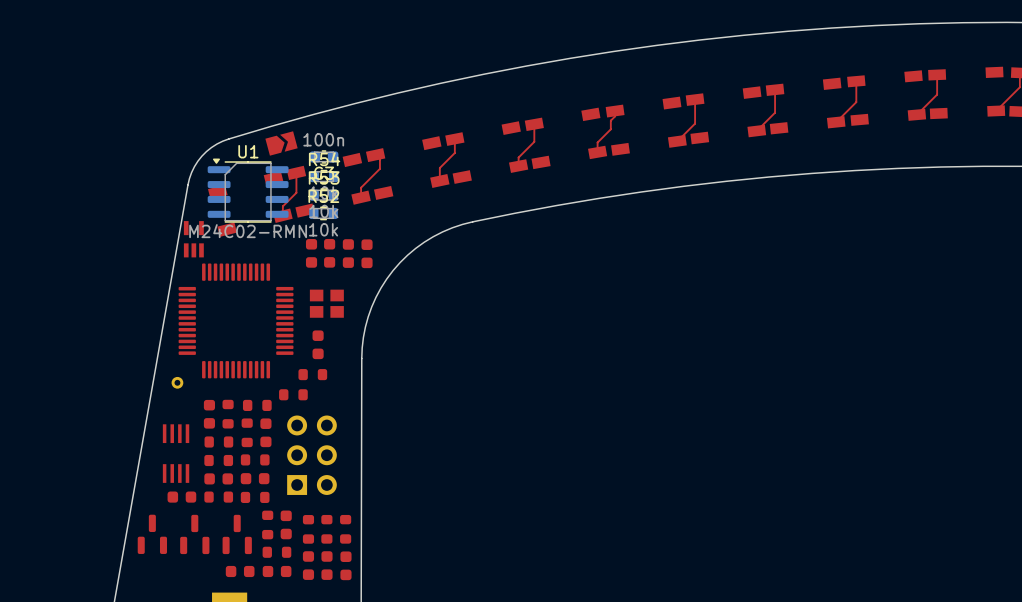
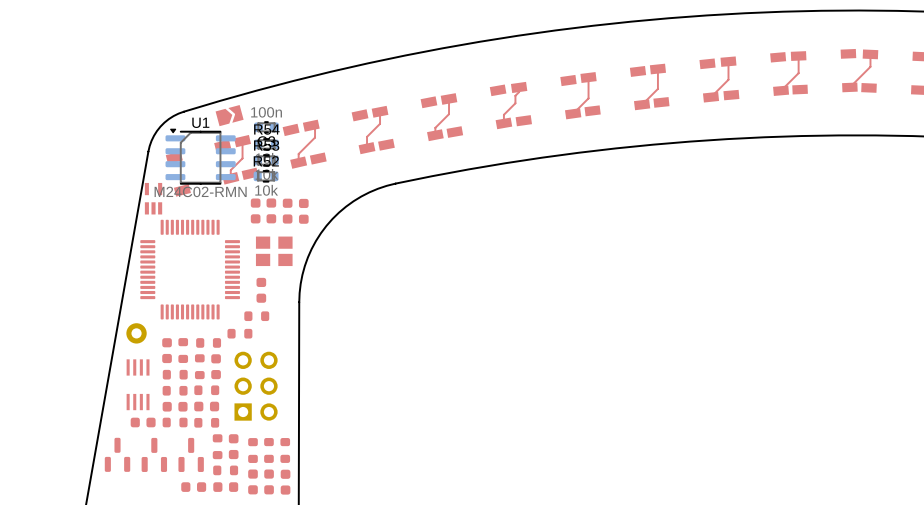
part footprint: [309, 289, 344, 318] -> [255, 236, 293, 267]
part: (177, 382) -> none
part: none -> (136, 333)

